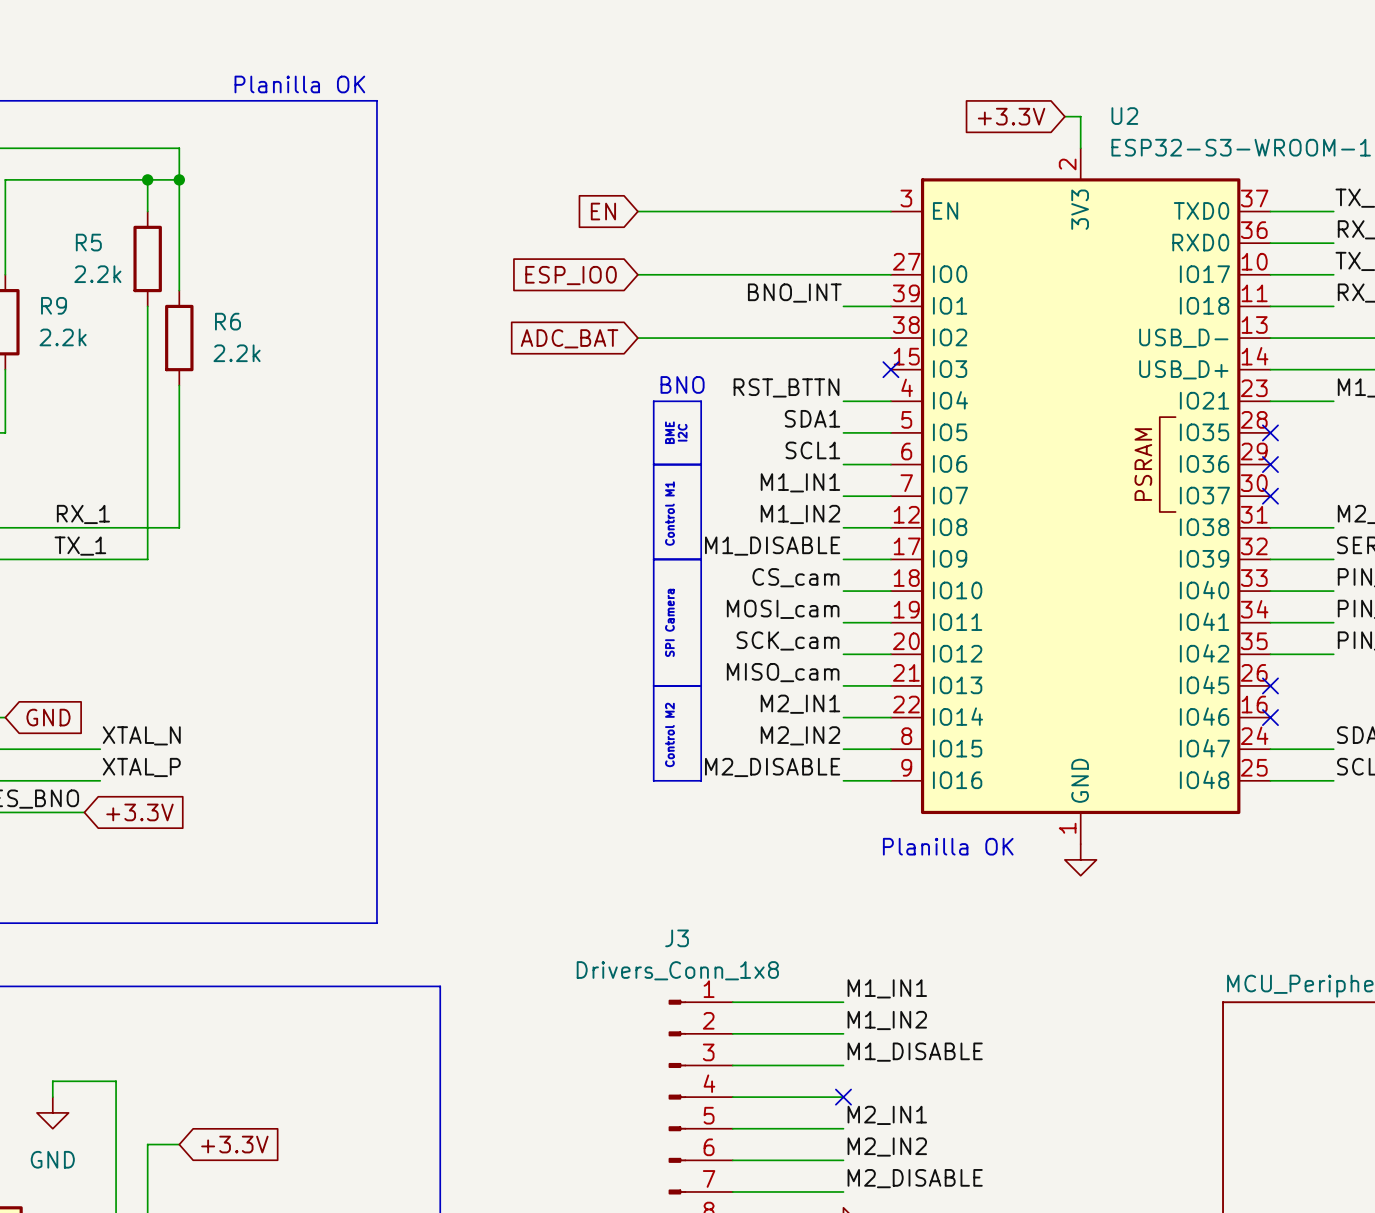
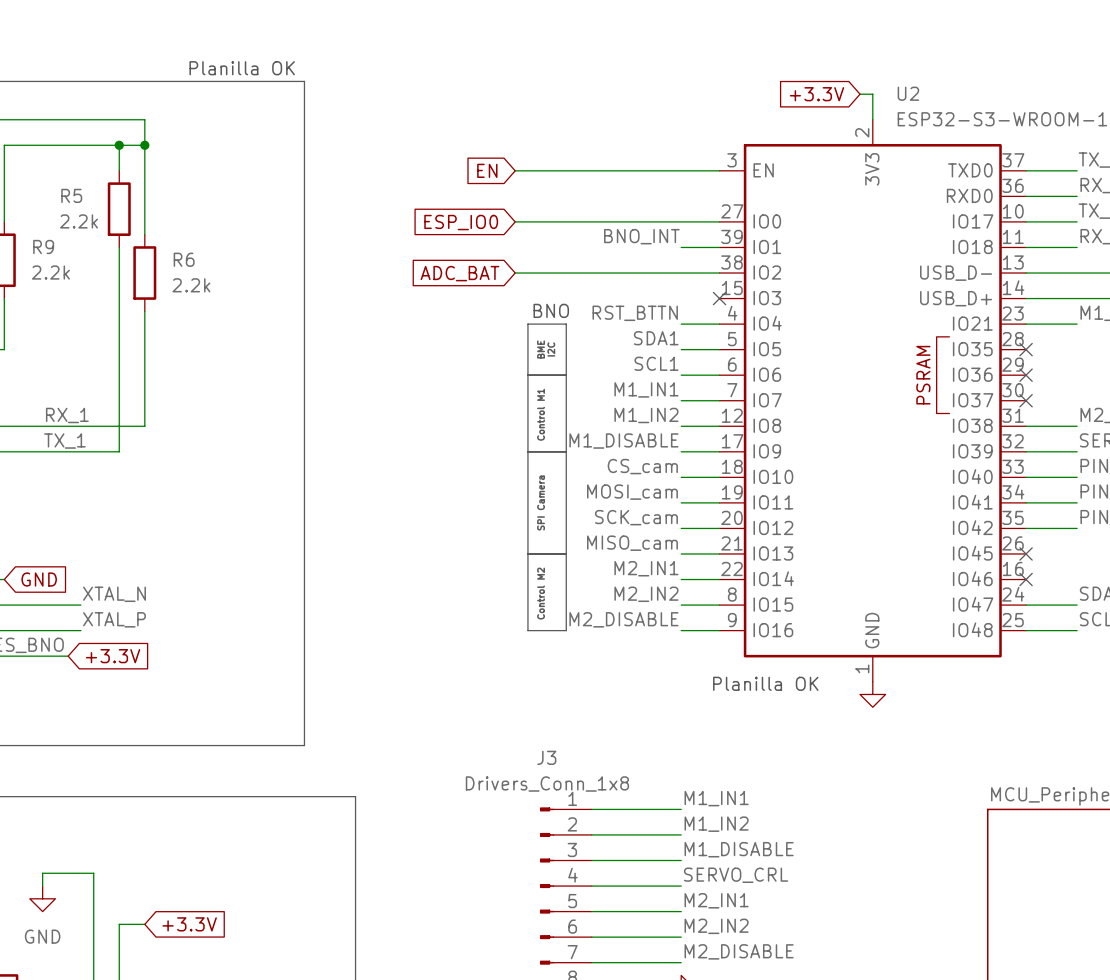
label: none -> SERVO_CRL (736, 875)
no-connect mark: (843, 1097) -> none

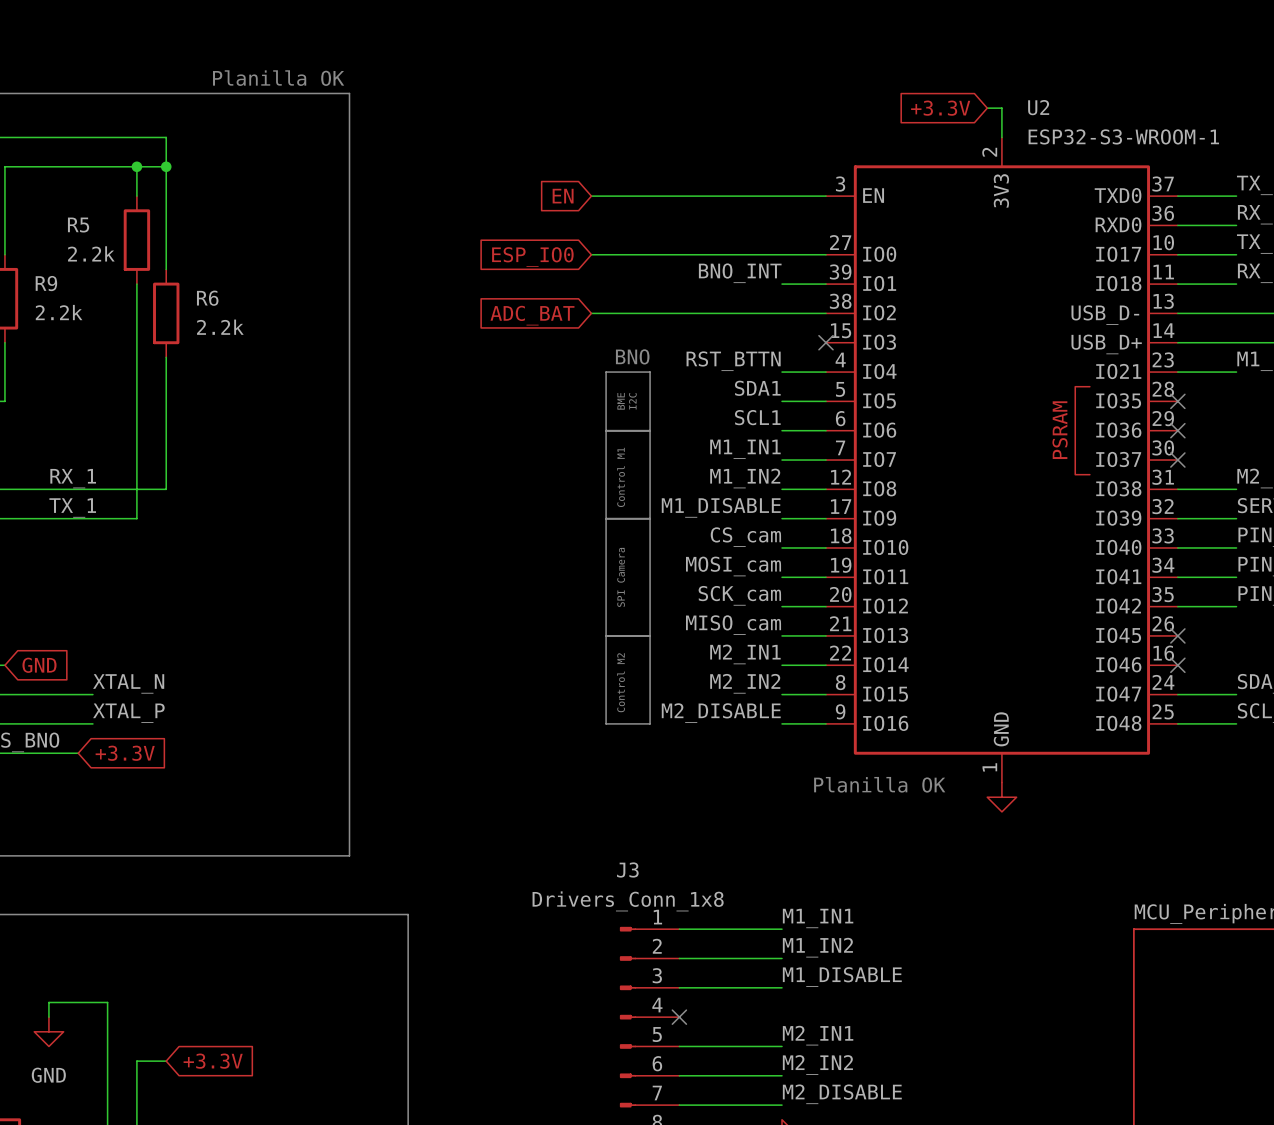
label: SERVO_CRL (736, 875) -> none
wire: (591, 886) (681, 886) -> none
no-connect mark: none -> (679, 1017)

